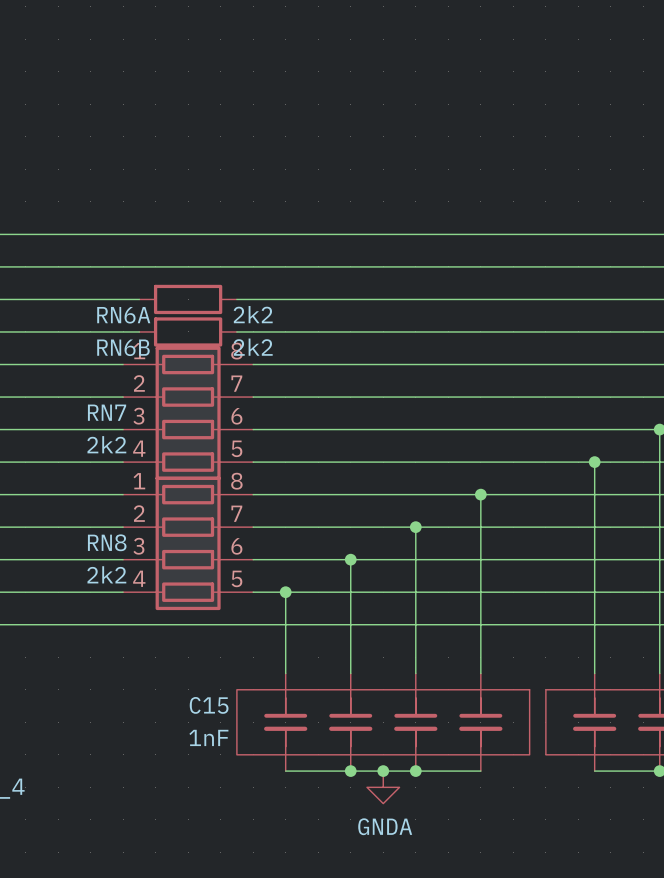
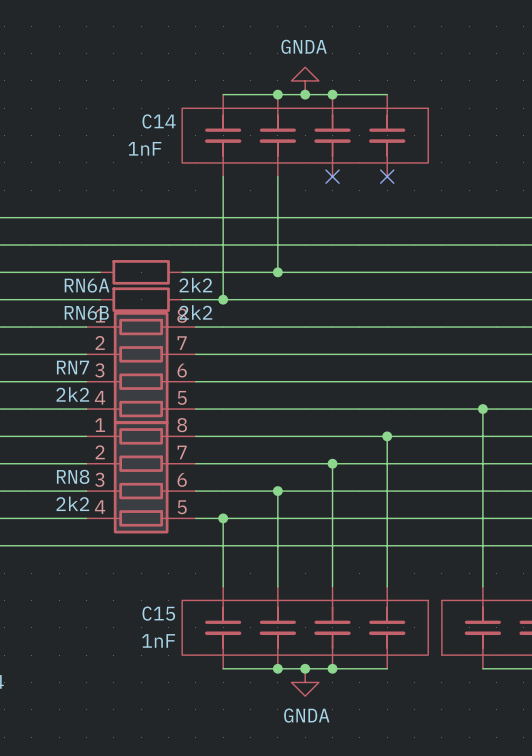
power symbol: none -> GNDA (305, 80)
wire: none -> (223, 94) (387, 94)
junction: none -> (277, 94)
junction: none -> (305, 94)
junction: none -> (332, 94)
C14: none -> 1nF (305, 135)
wire: none -> (223, 176) (223, 299)
wire: none -> (277, 176) (277, 272)
no-connect mark: none -> (332, 176)
no-connect mark: none -> (387, 176)
junction: none -> (277, 272)
junction: none -> (223, 299)

